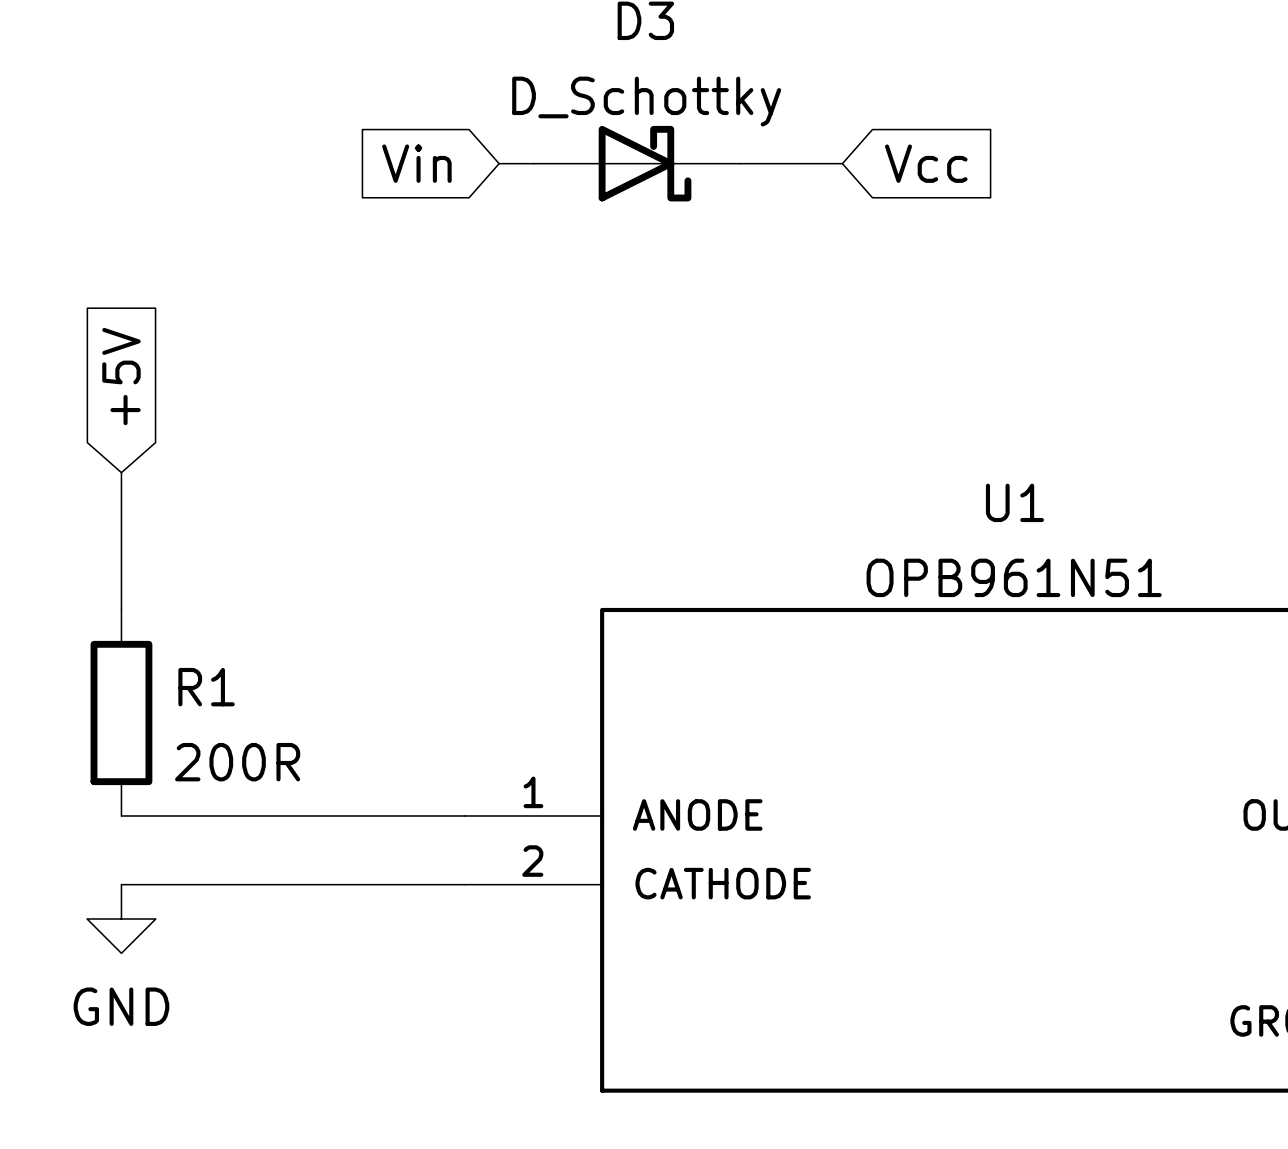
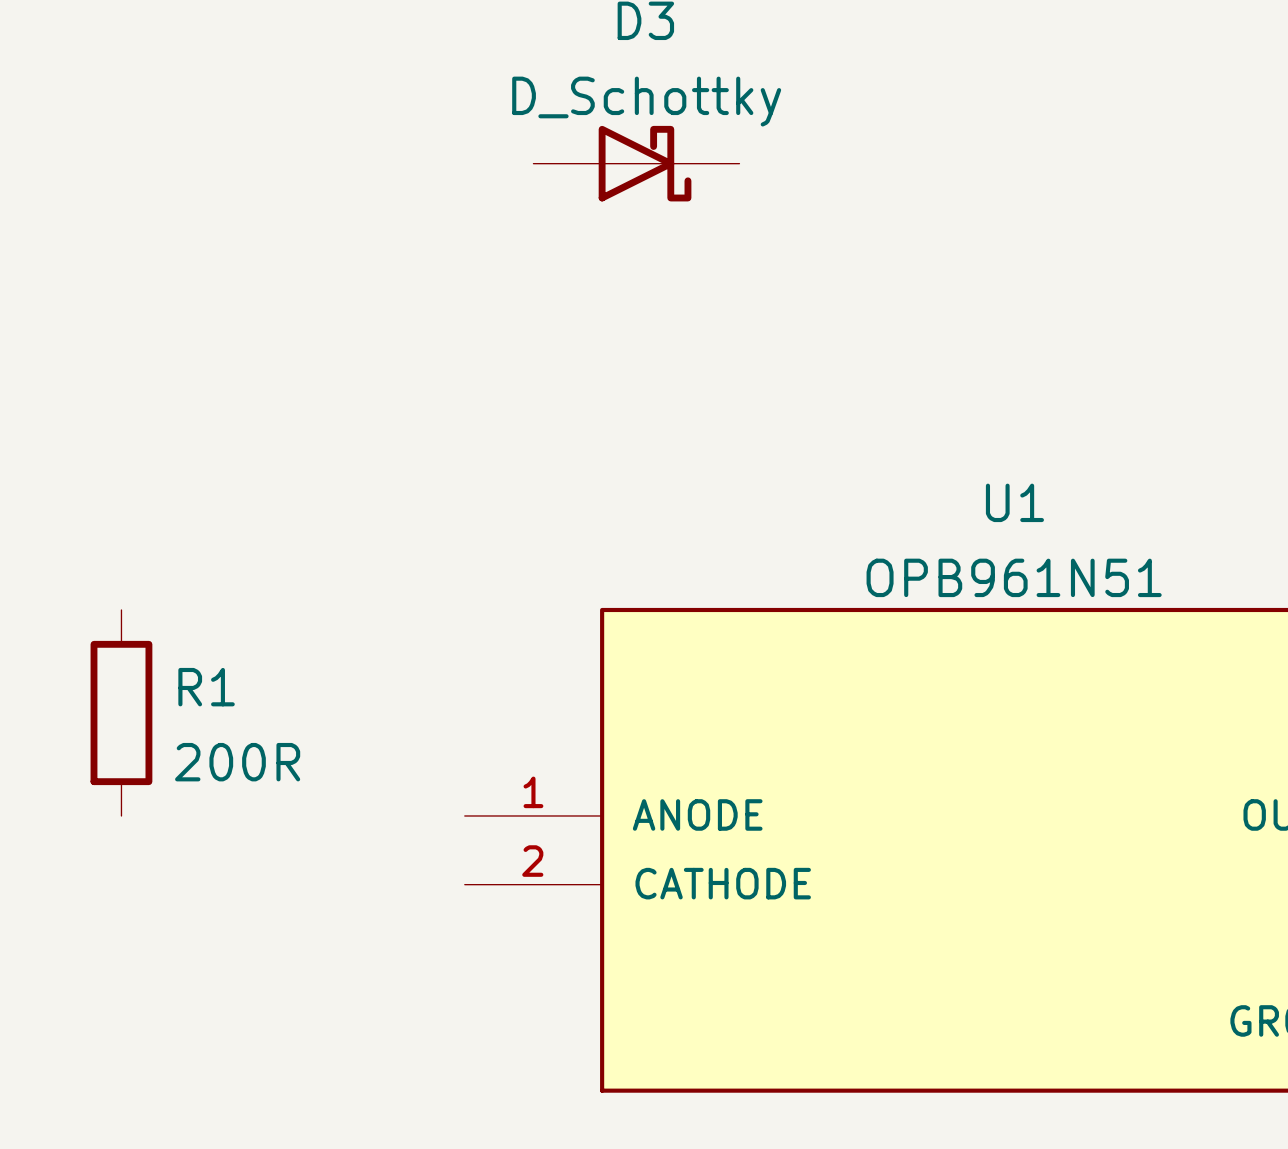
global label: Vin (416, 163) -> none
wire: (499, 163) (533, 163) -> none
wire: (739, 163) (842, 163) -> none
global label: Vcc (926, 163) -> none
global label: +5V (121, 376) -> none
wire: (121, 472) (121, 609) -> none
wire: (121, 815) (464, 815) -> none
wire: (121, 884) (464, 884) -> none
power symbol: GND (121, 918) -> none

